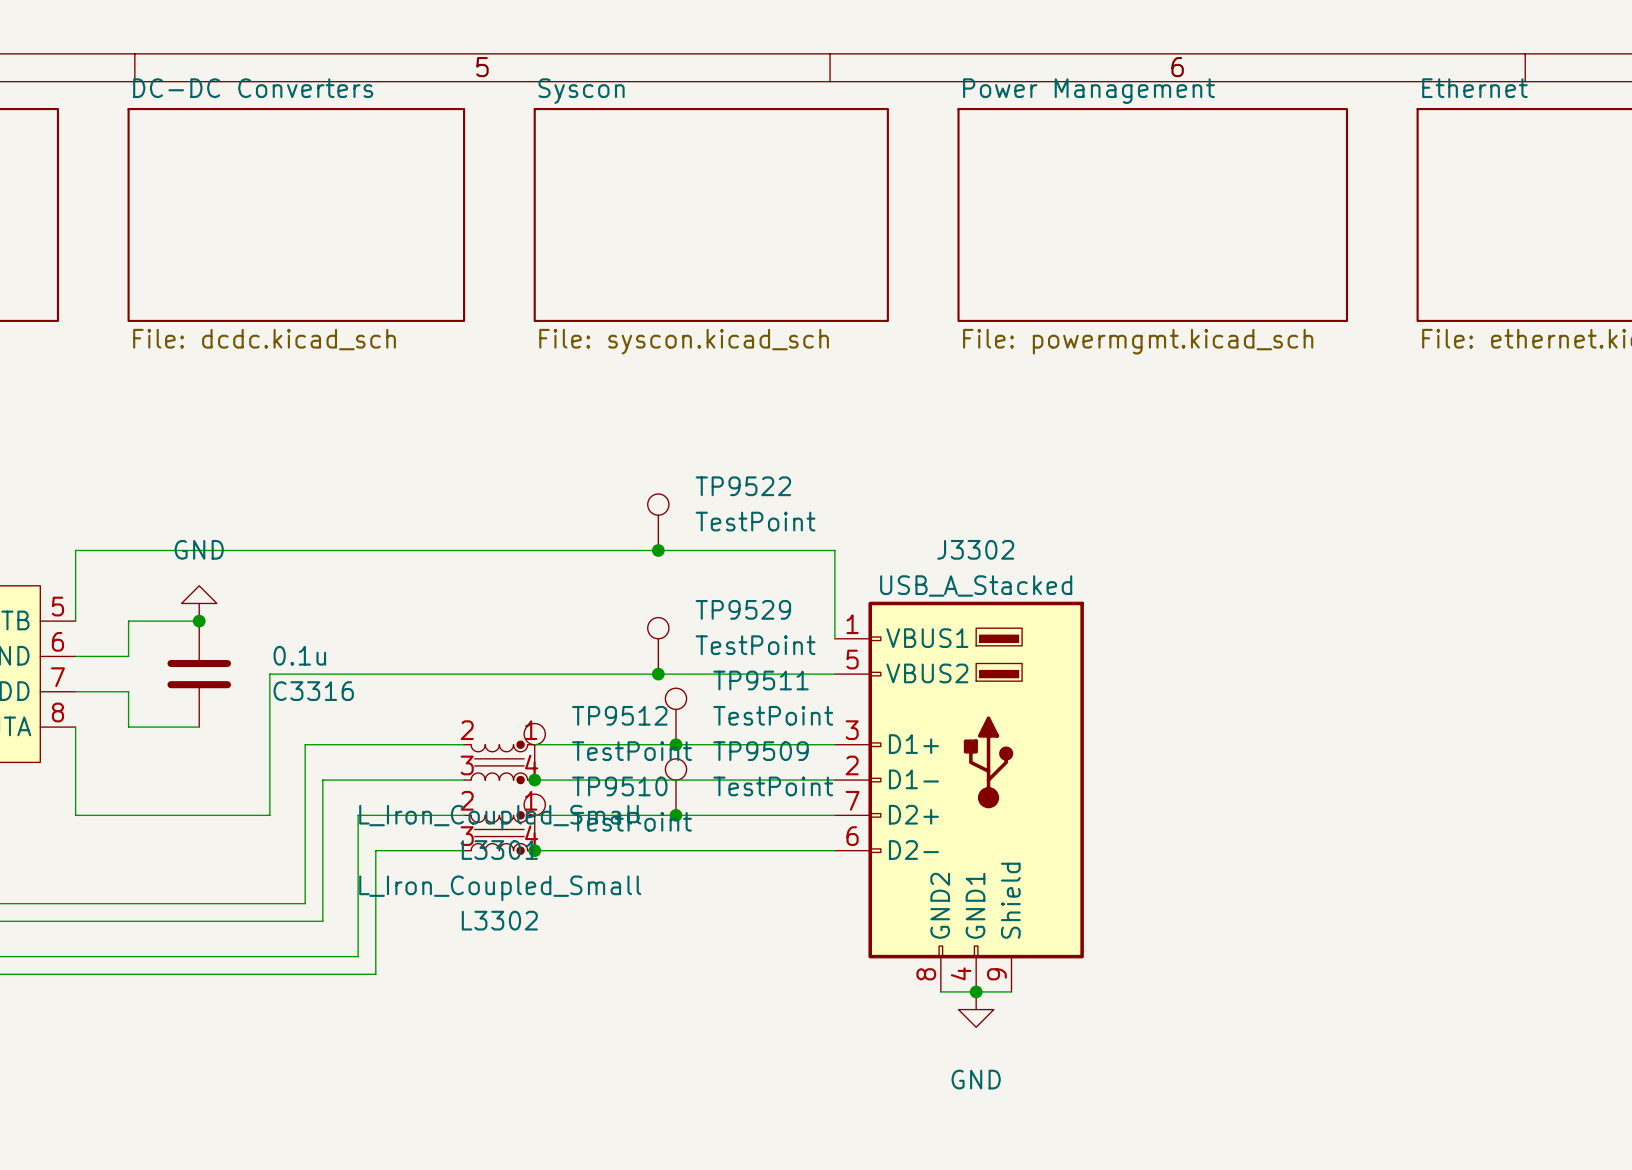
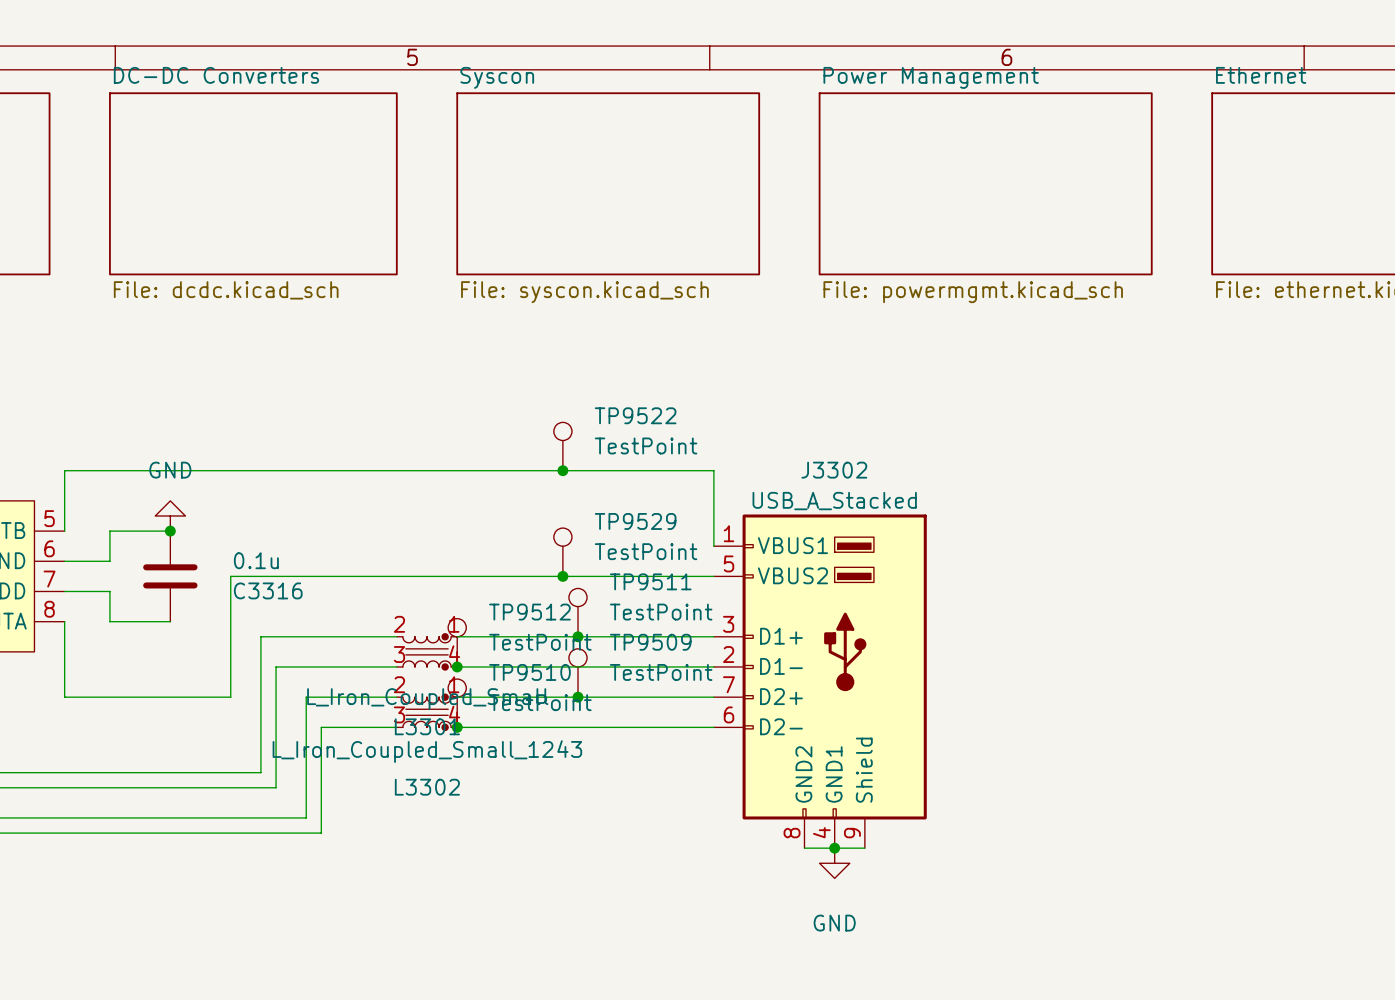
L3302 value: L_Iron_Coupled_Small (500, 888) -> L_Iron_Coupled_Small_1243 (427, 751)

